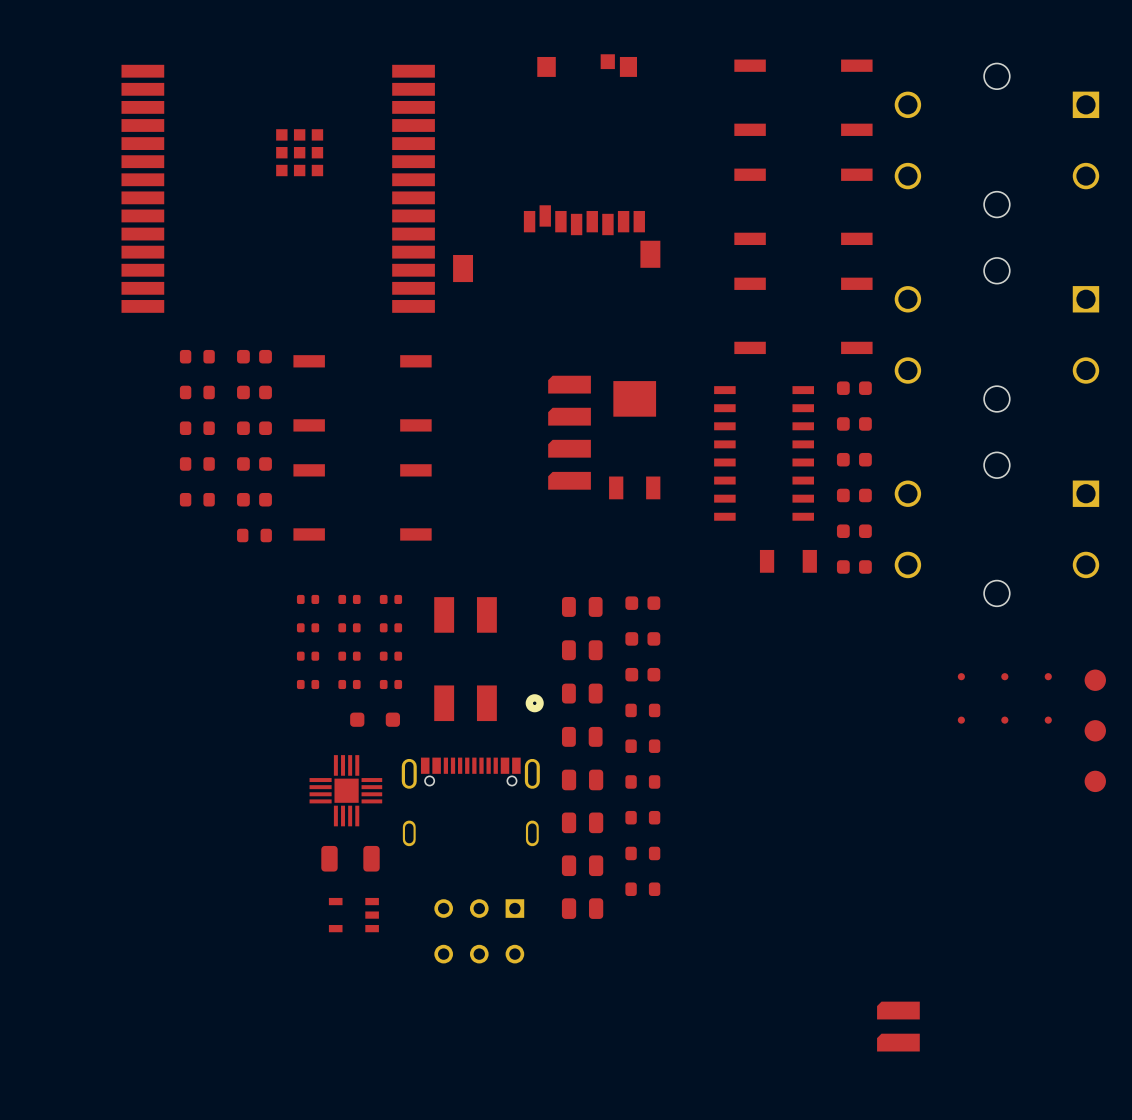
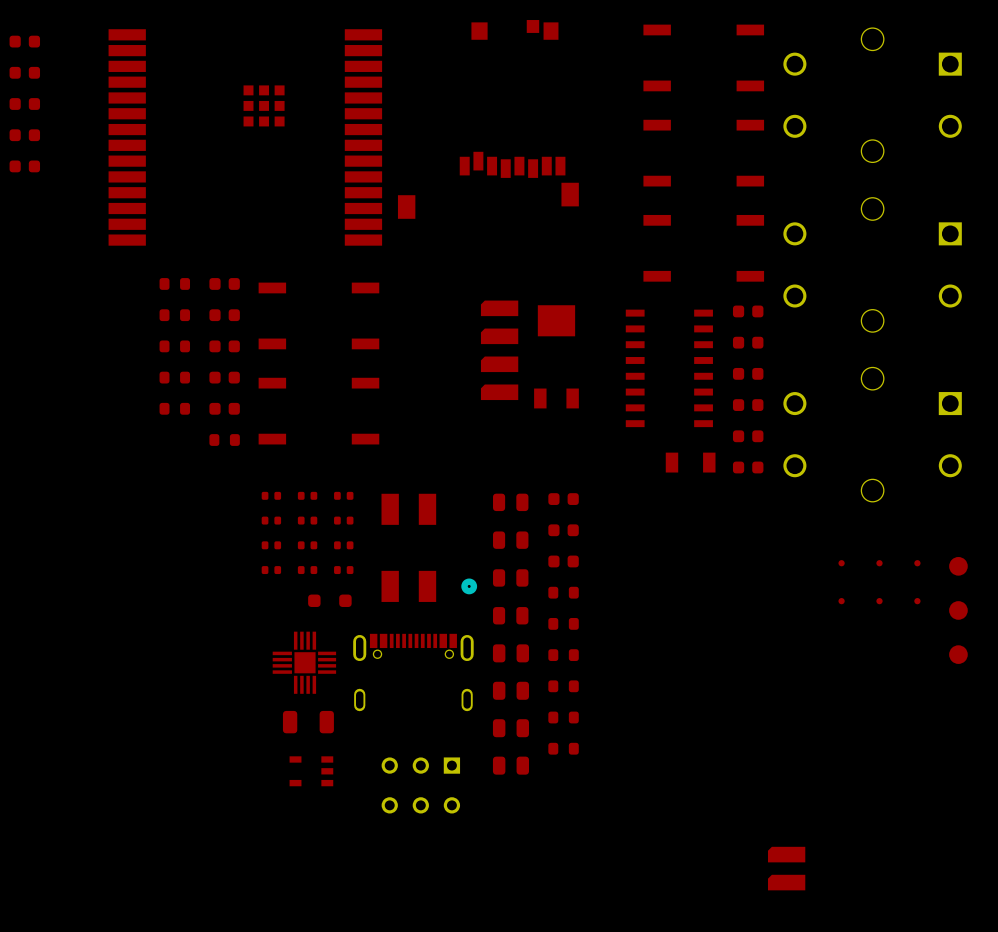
part: none -> (24, 41)
part: none -> (24, 72)
part: none -> (24, 104)
part: none -> (24, 135)
part: none -> (24, 166)

